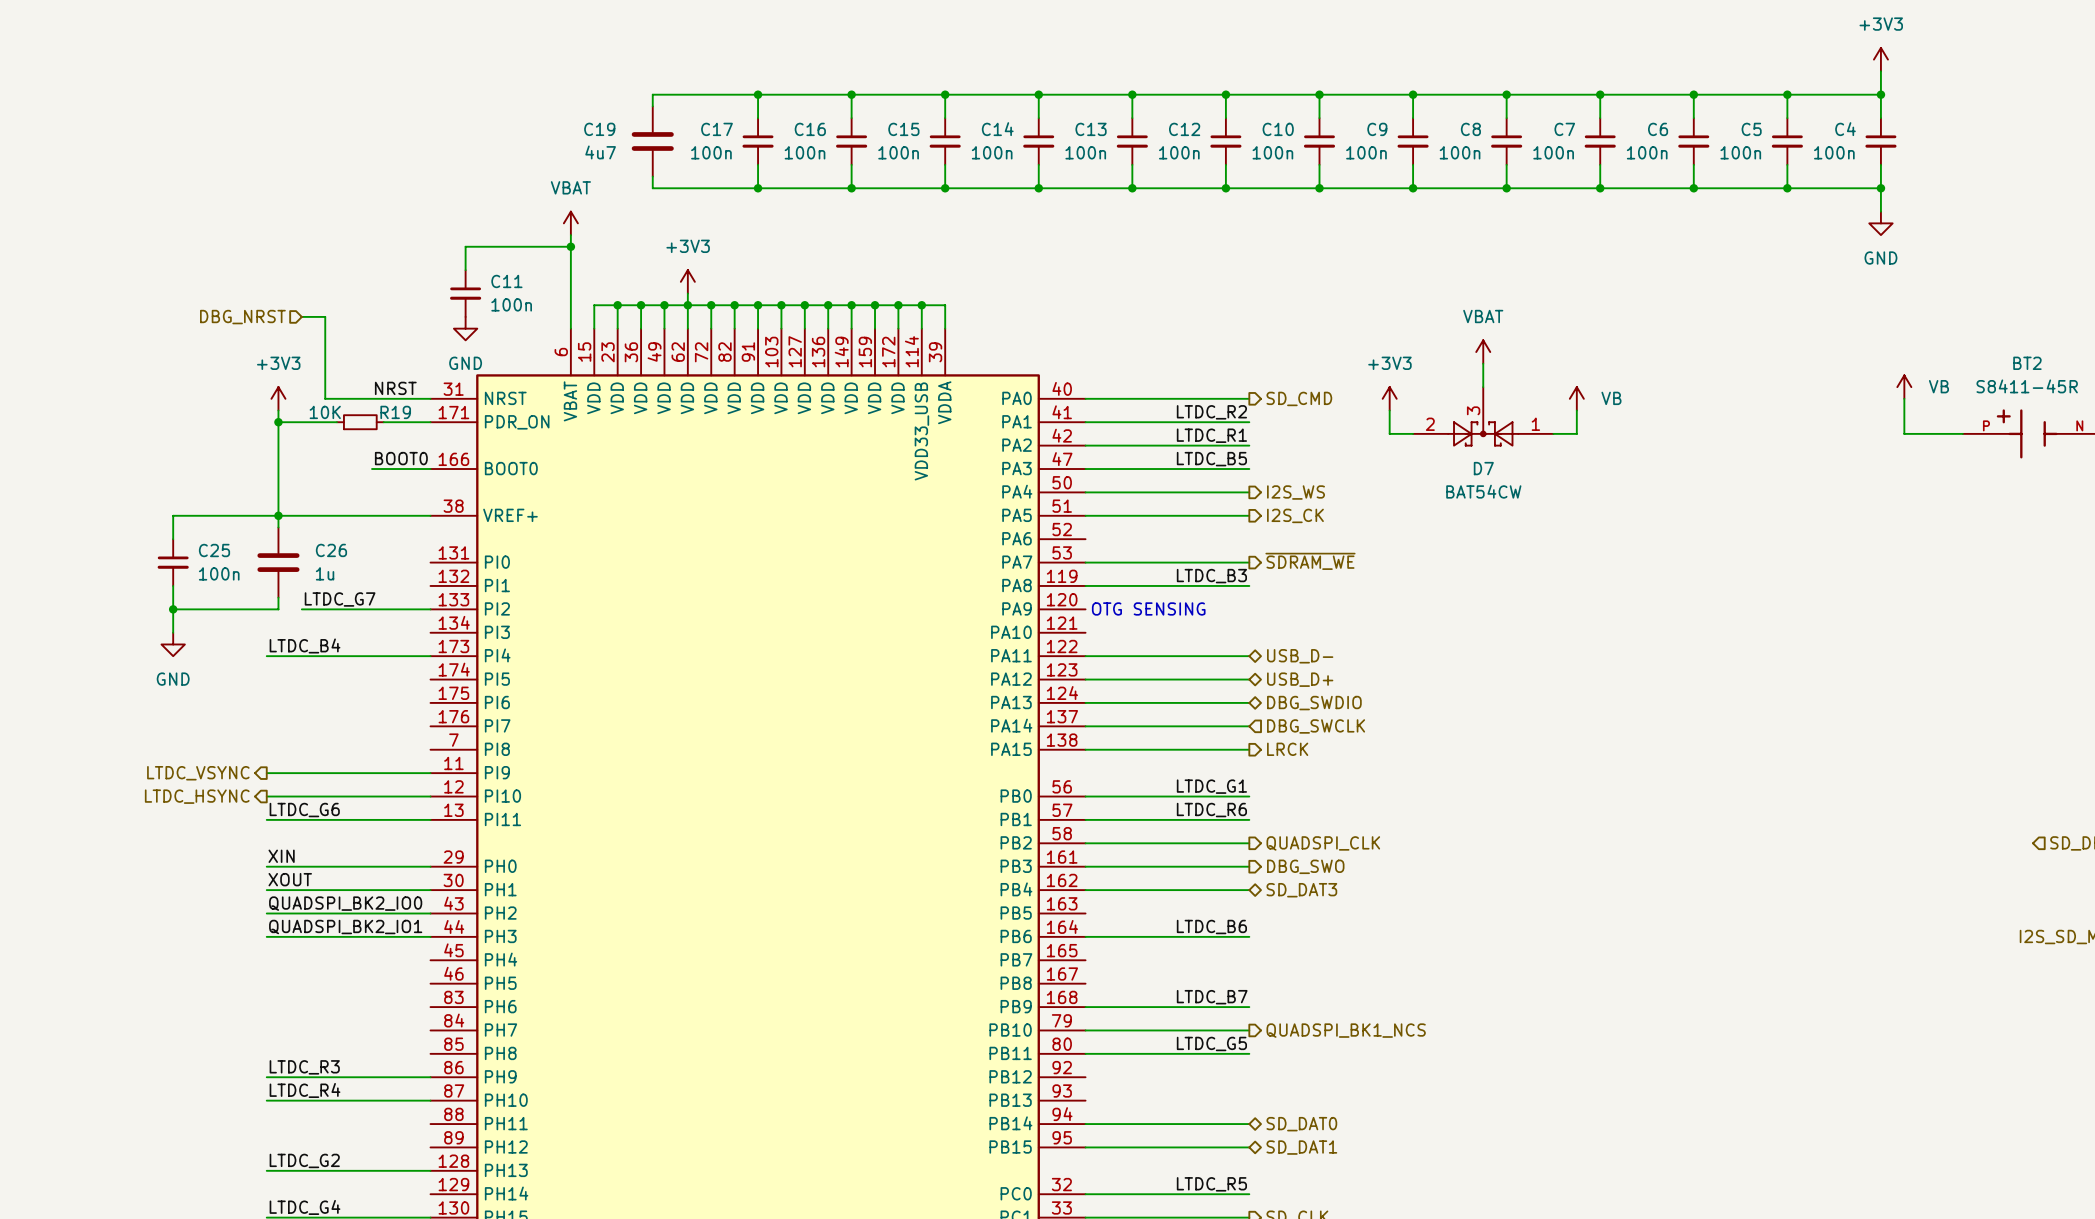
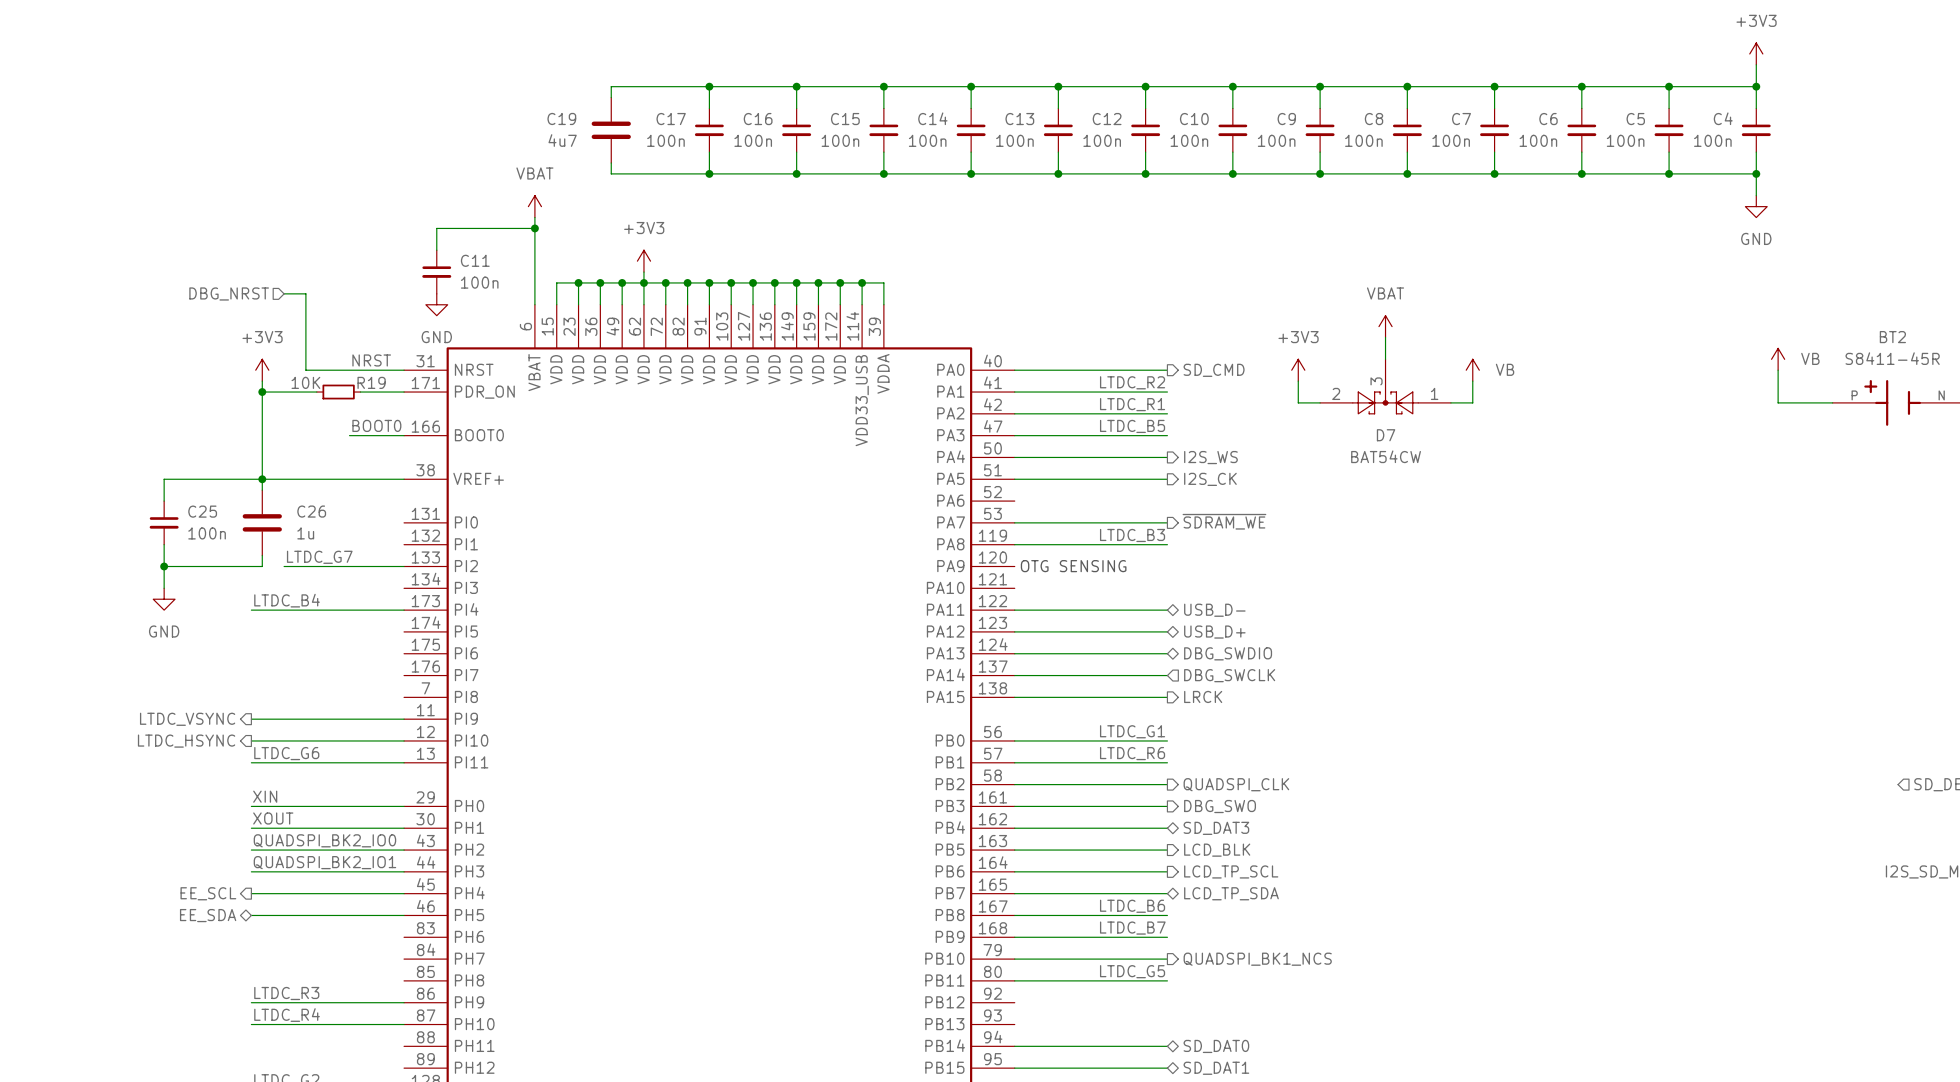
wire: none -> (1014, 850) (1167, 850)
hierarchical label: none -> LCD_BLK (1217, 850)
label position: LTDC_B6 (1211, 927) -> LTDC_B6 (1132, 906)
hierarchical label: none -> LCD_TP_SCL (1231, 871)
hierarchical label: none -> EE_SCL (208, 893)
wire: none -> (251, 893) (404, 893)
wire: none -> (1014, 893) (1167, 893)
hierarchical label: none -> LCD_TP_SDA (1231, 893)
hierarchical label: none -> EE_SDA (208, 915)
wire: none -> (251, 915) (404, 915)
wire: none -> (1014, 915) (1167, 915)

